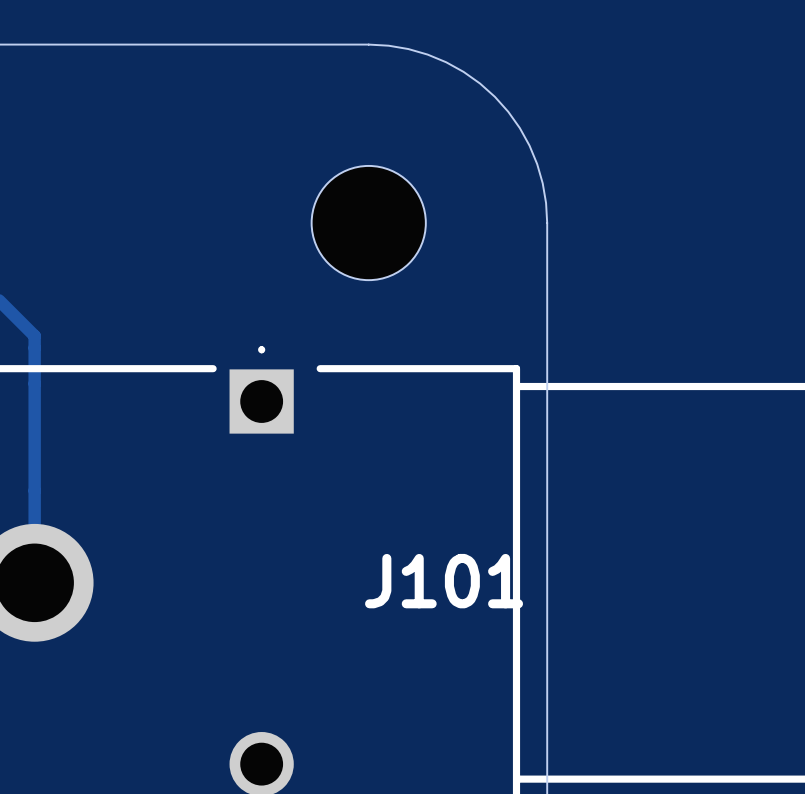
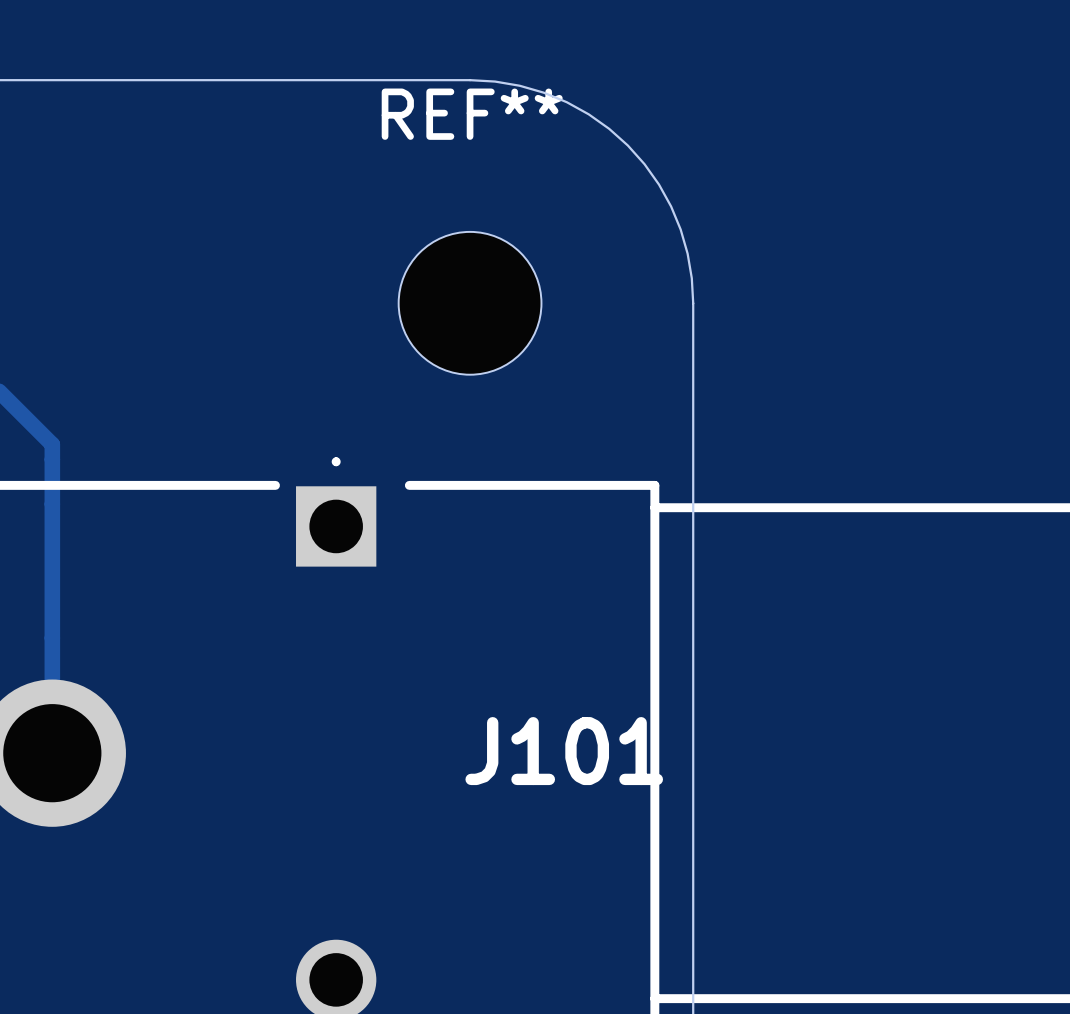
REF** name: none -> REF** (472, 114)

